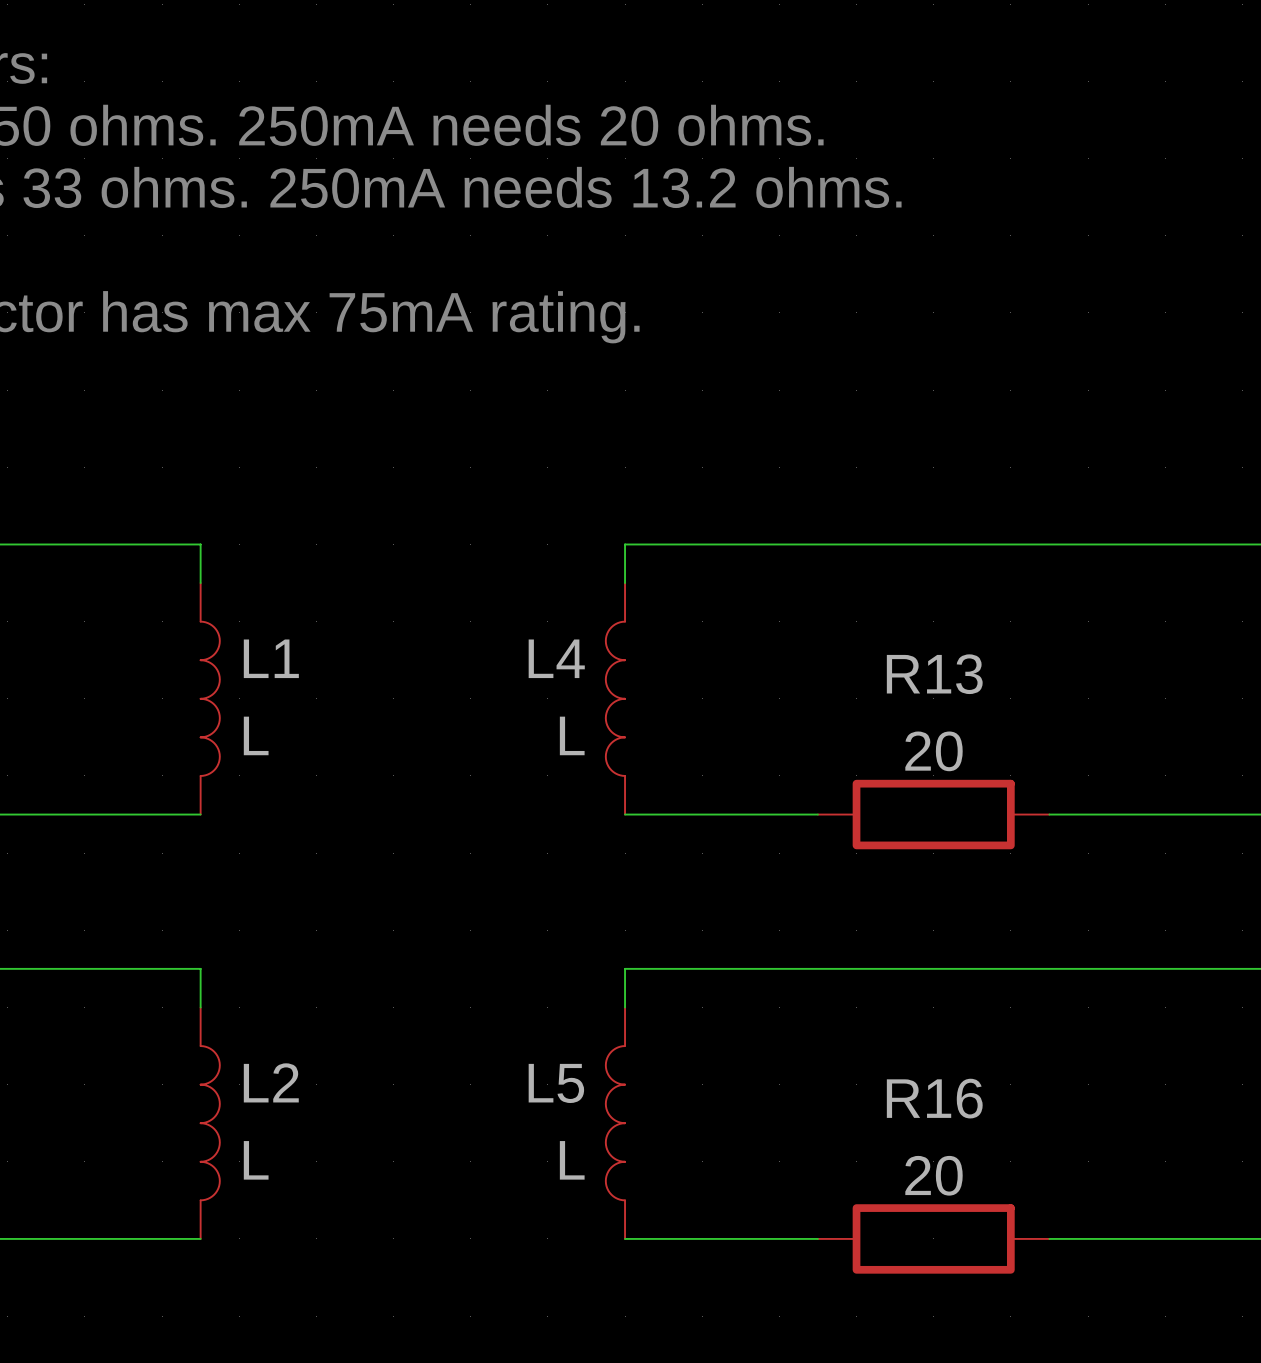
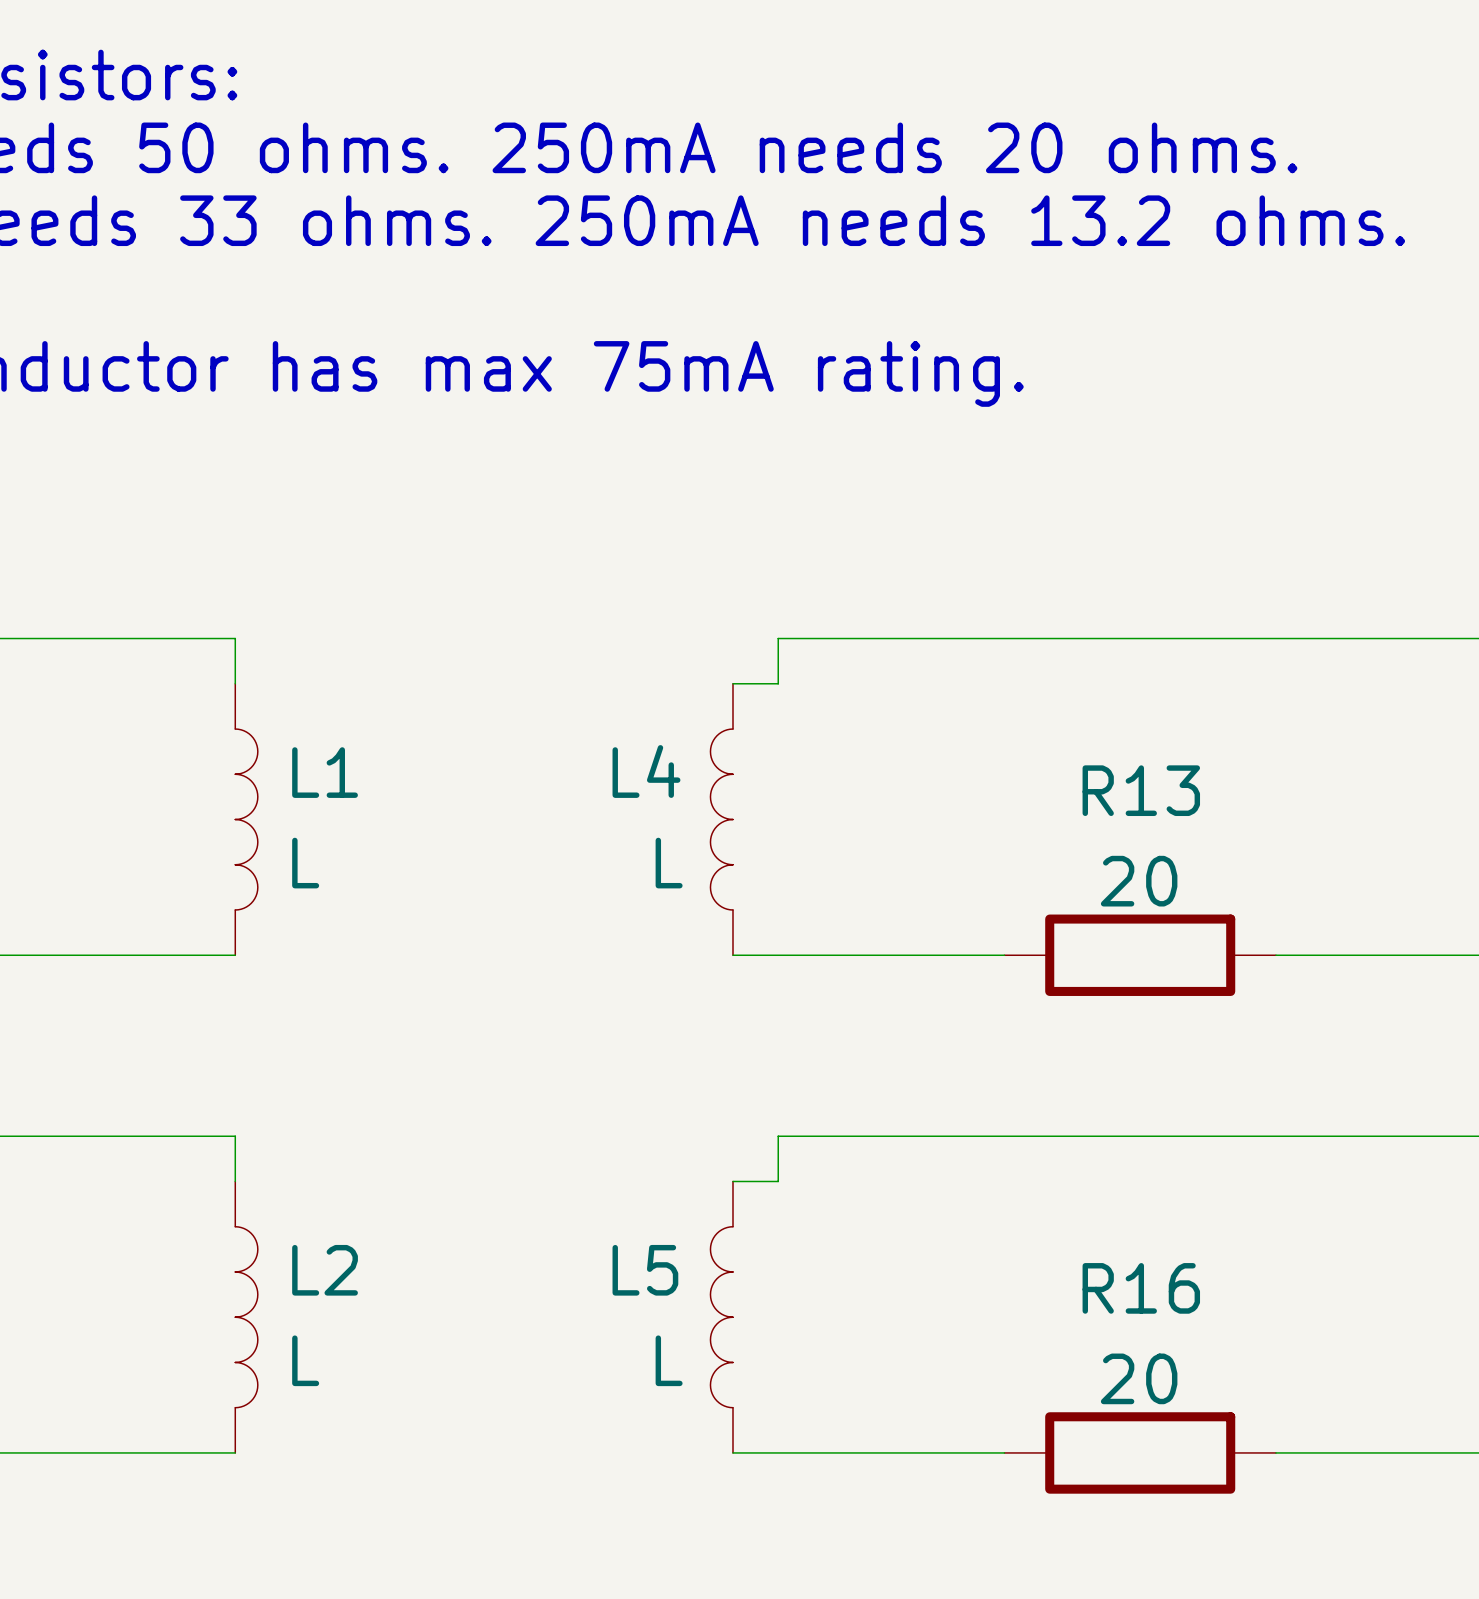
wire: (663, 544) (625, 544) (625, 583) -> (778, 638) (778, 683) (732, 683)
R13 position: (933, 814) -> (1140, 955)
wire: (663, 968) (625, 968) (625, 1007) -> (778, 1136) (778, 1181) (732, 1181)
R16 position: (933, 1238) -> (1140, 1452)

